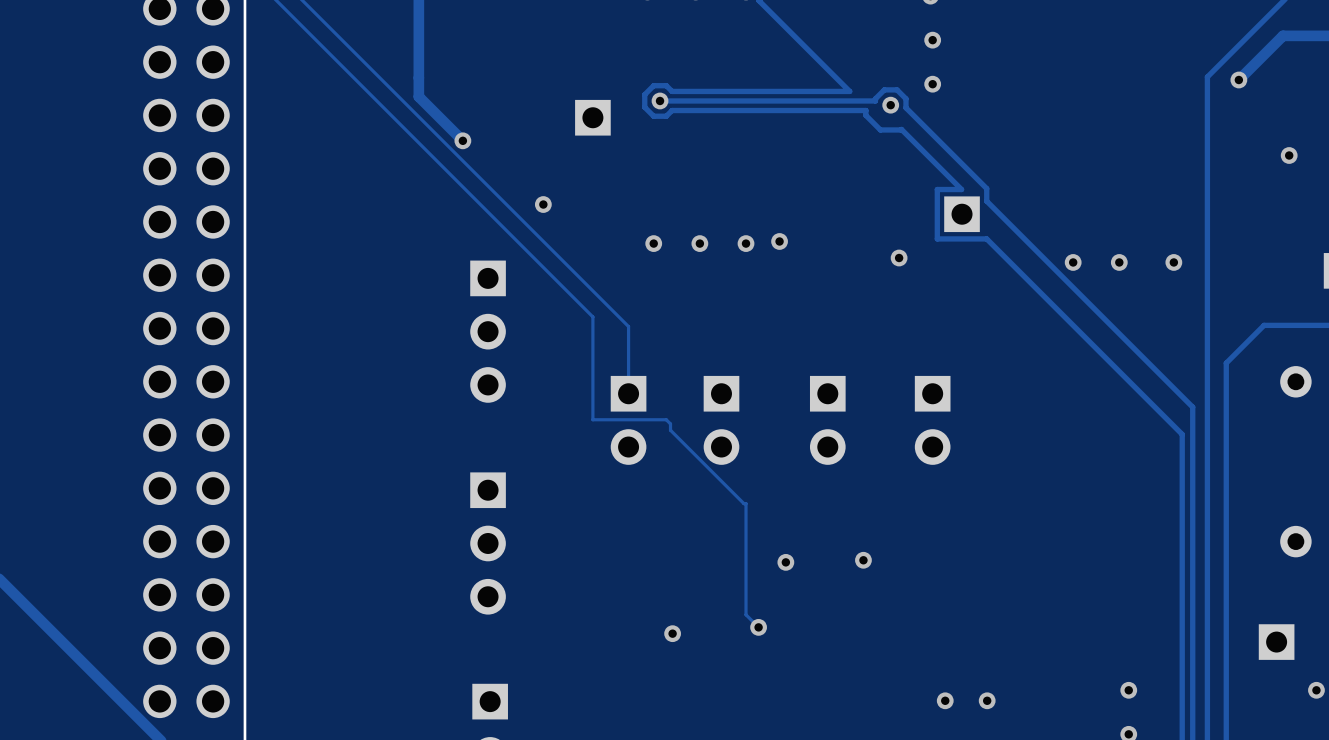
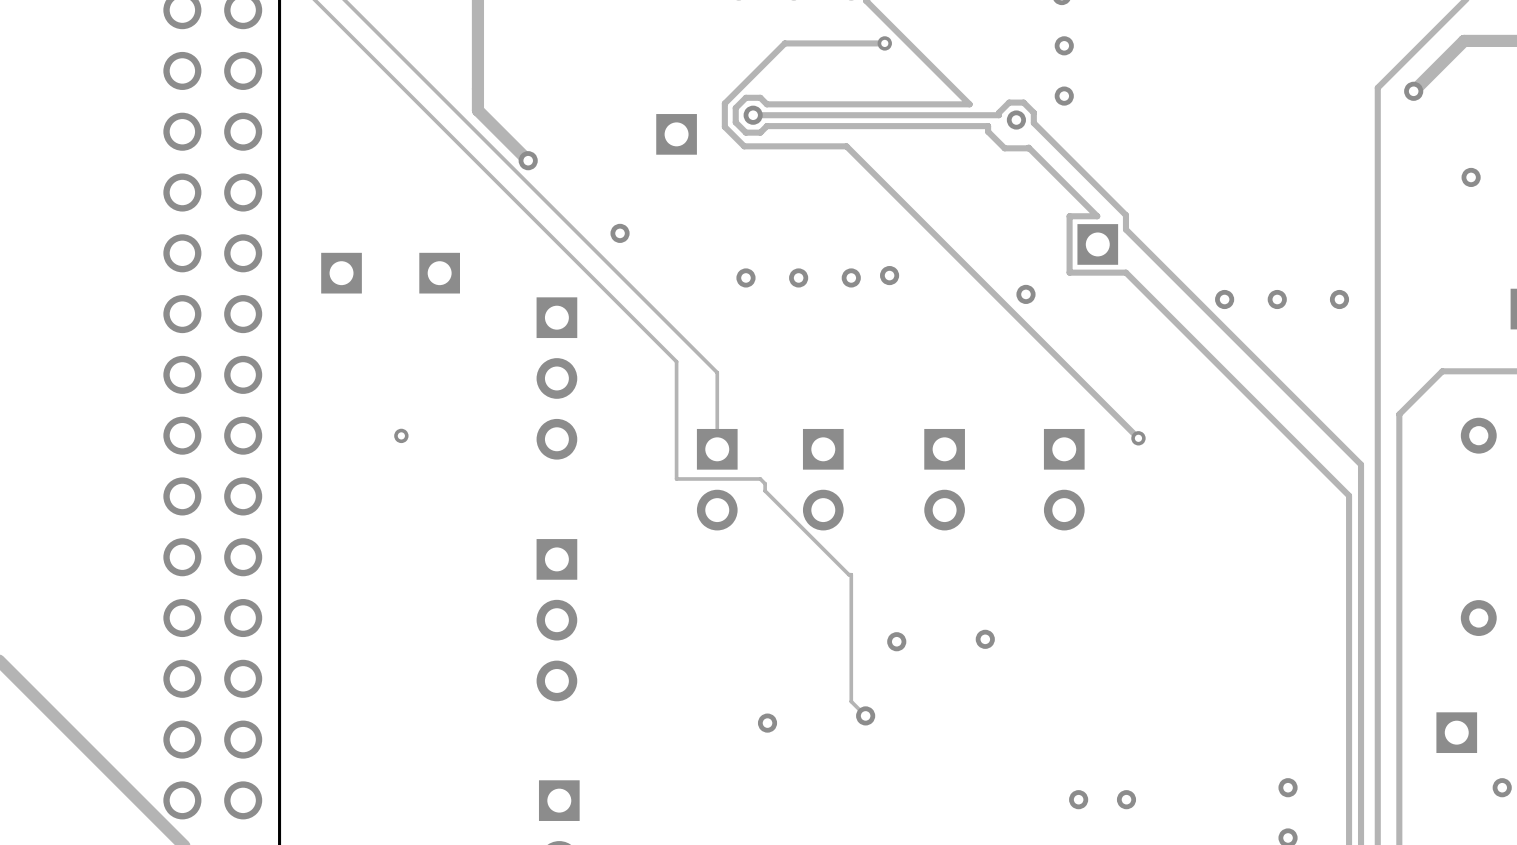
via: none -> (884, 43)
track: none -> (887, 43) (784, 43) (724, 103) (724, 126) (744, 146) (846, 146) (1138, 438)
part: none -> (341, 273)
part: none -> (439, 273)
via: none -> (401, 435)
via: none -> (1138, 438)

